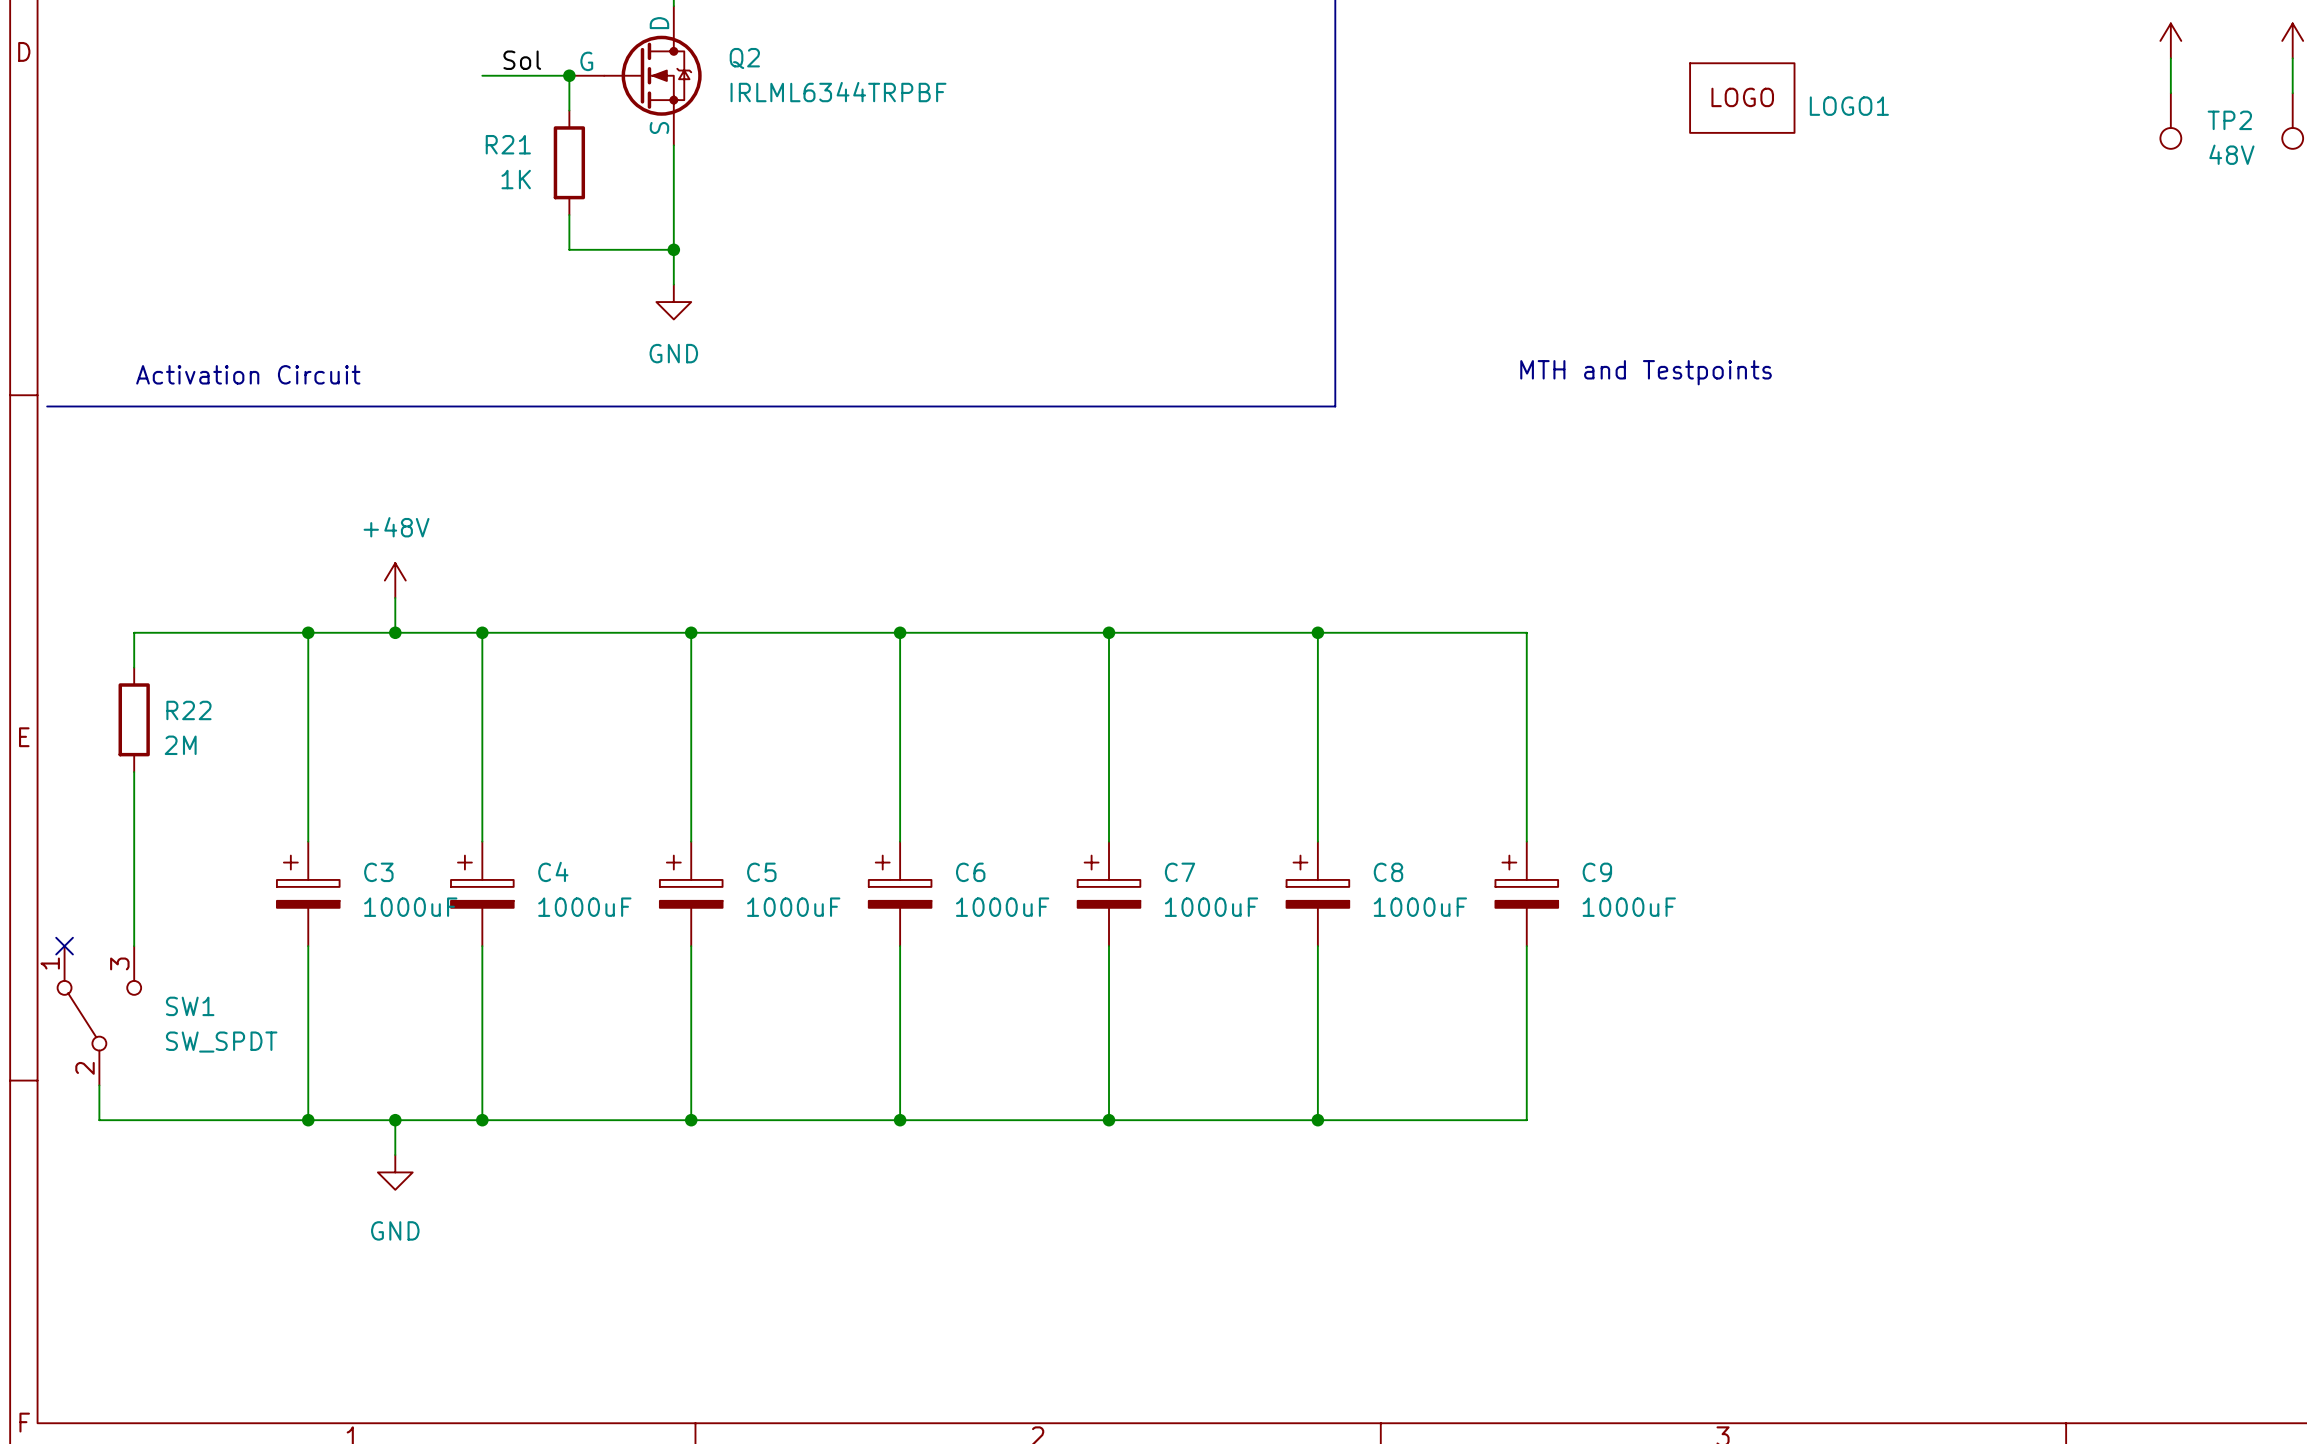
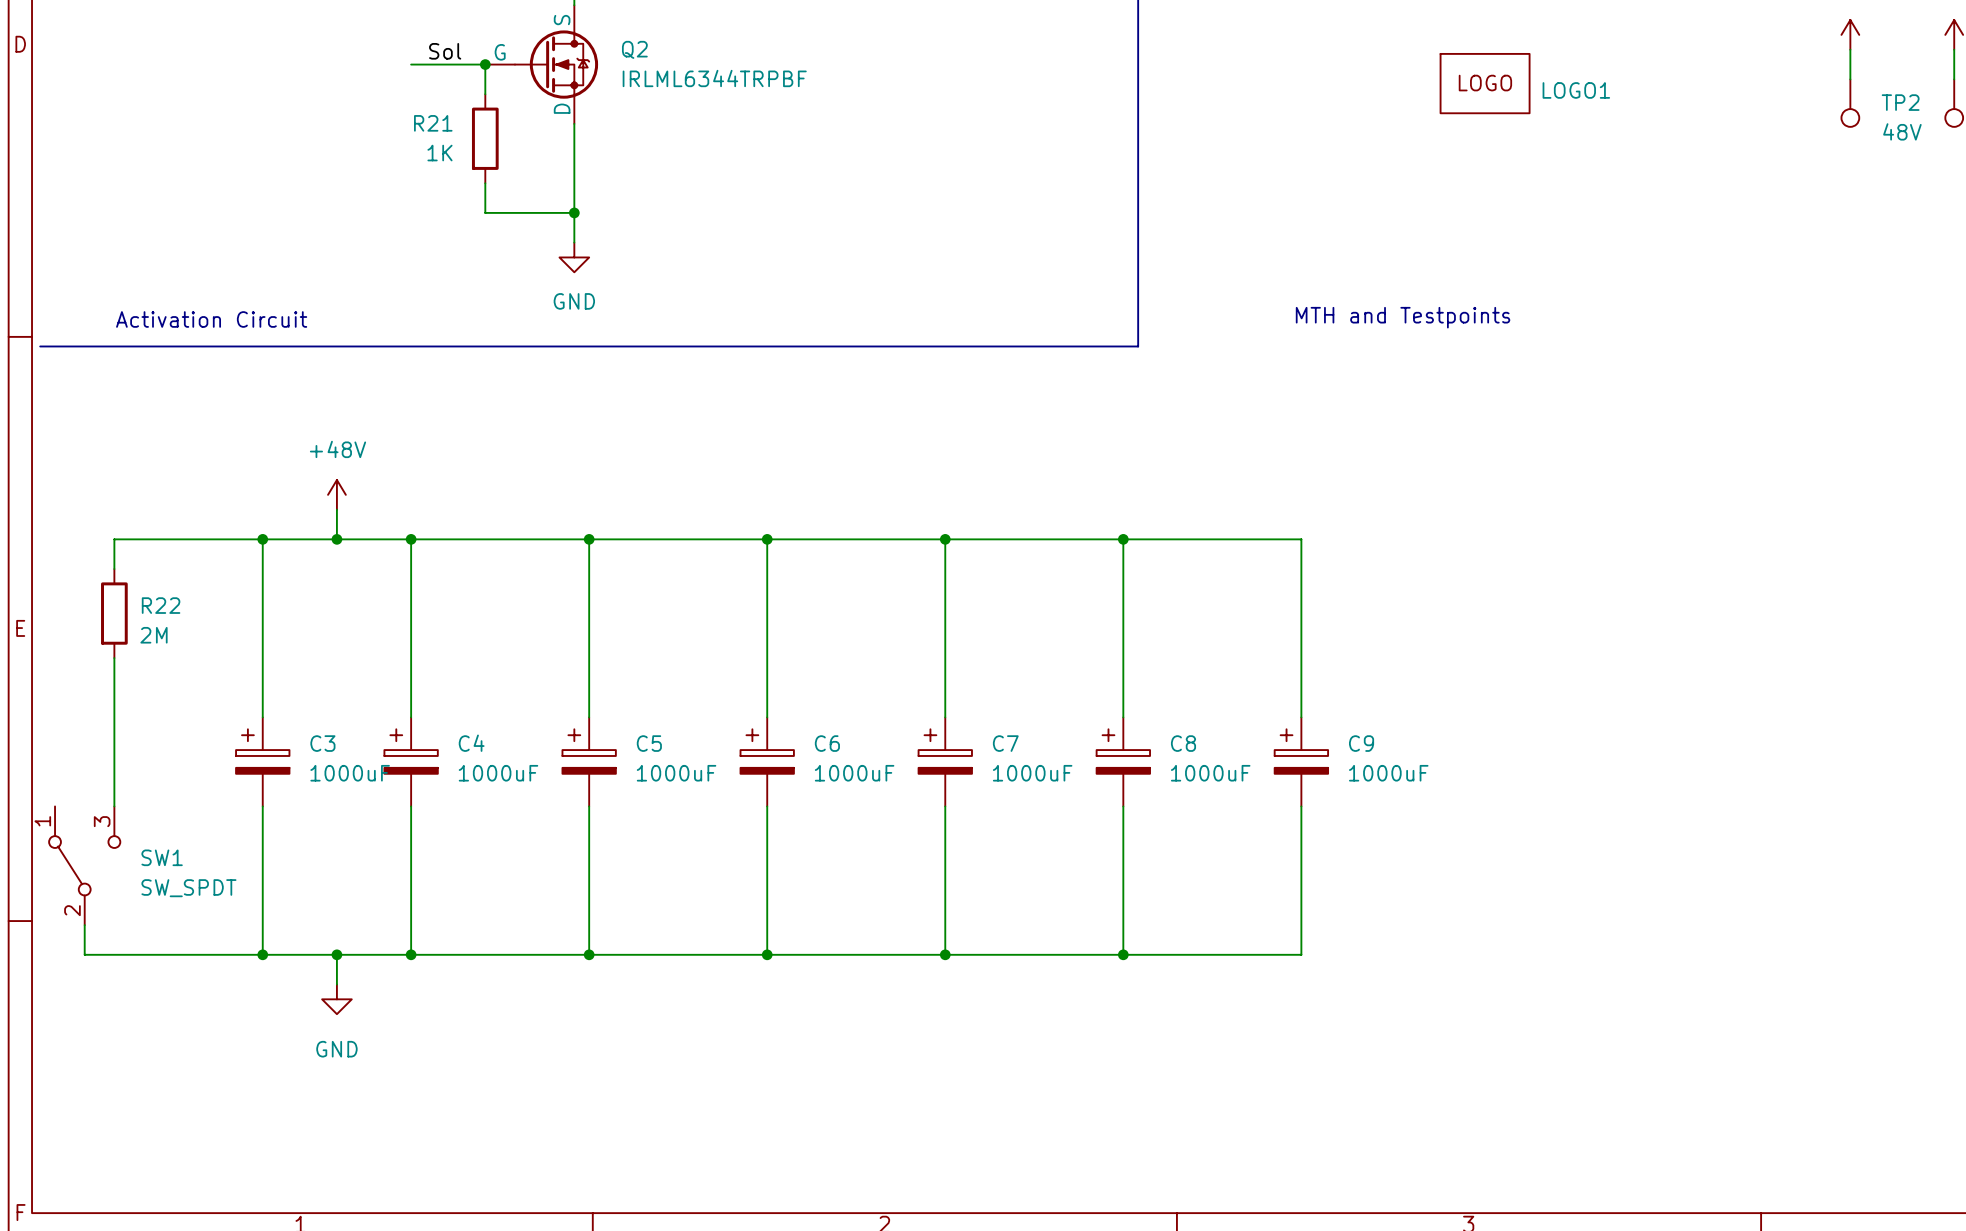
Q2 pin name: D (659, 23) -> S (562, 20)
Q2 pin name: S (659, 127) -> D (562, 108)
no-connect mark: (64, 946) -> none

